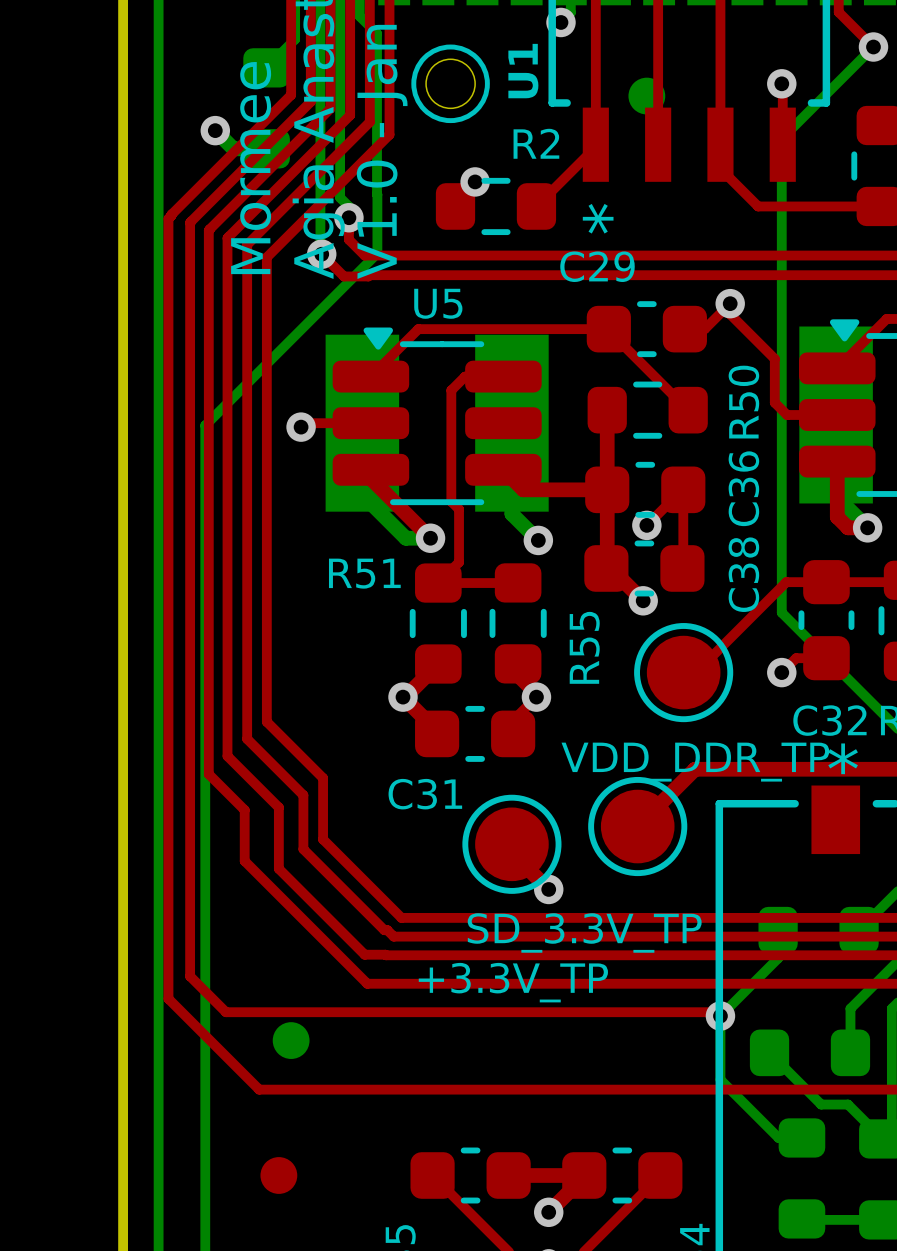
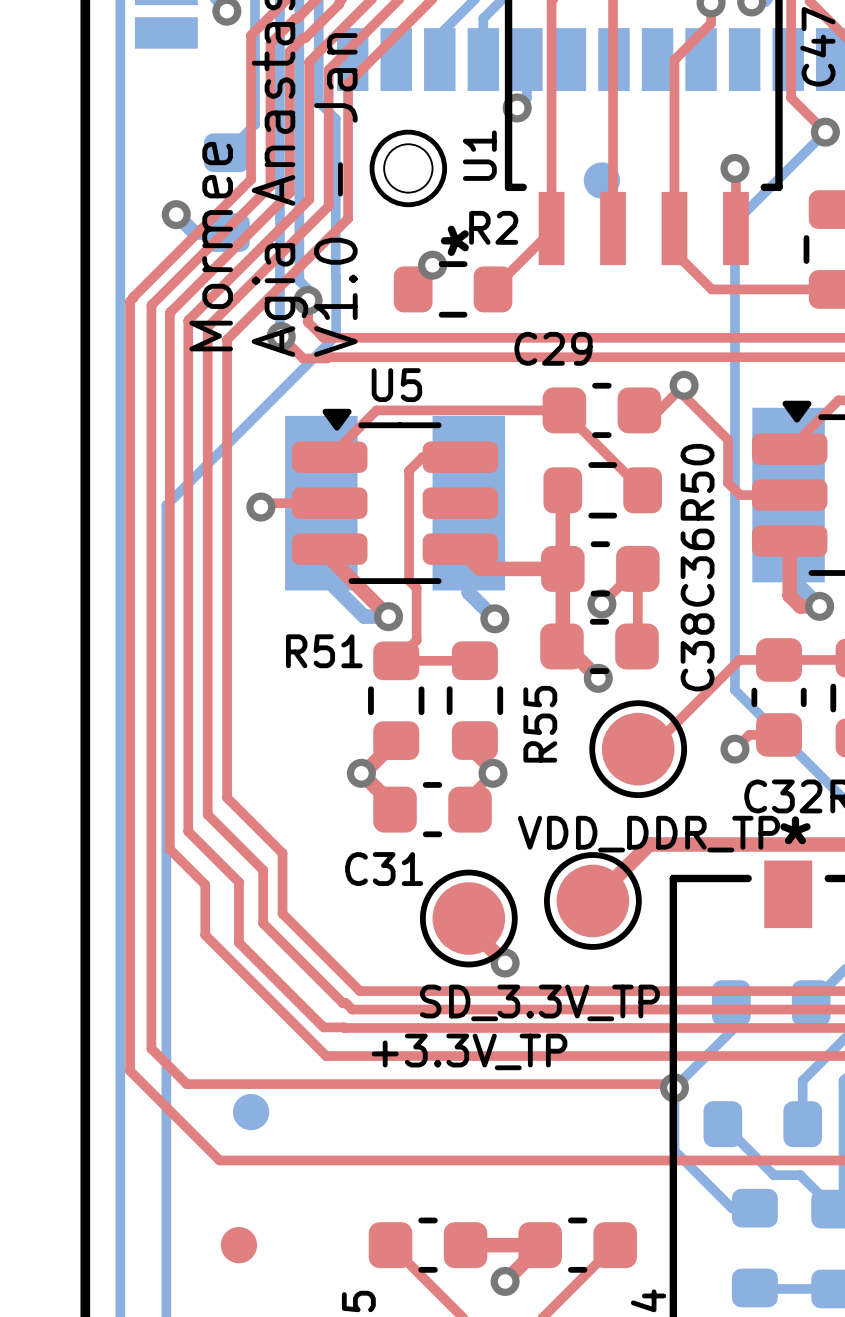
U1 text position: * (598, 218) -> * (454, 240)

